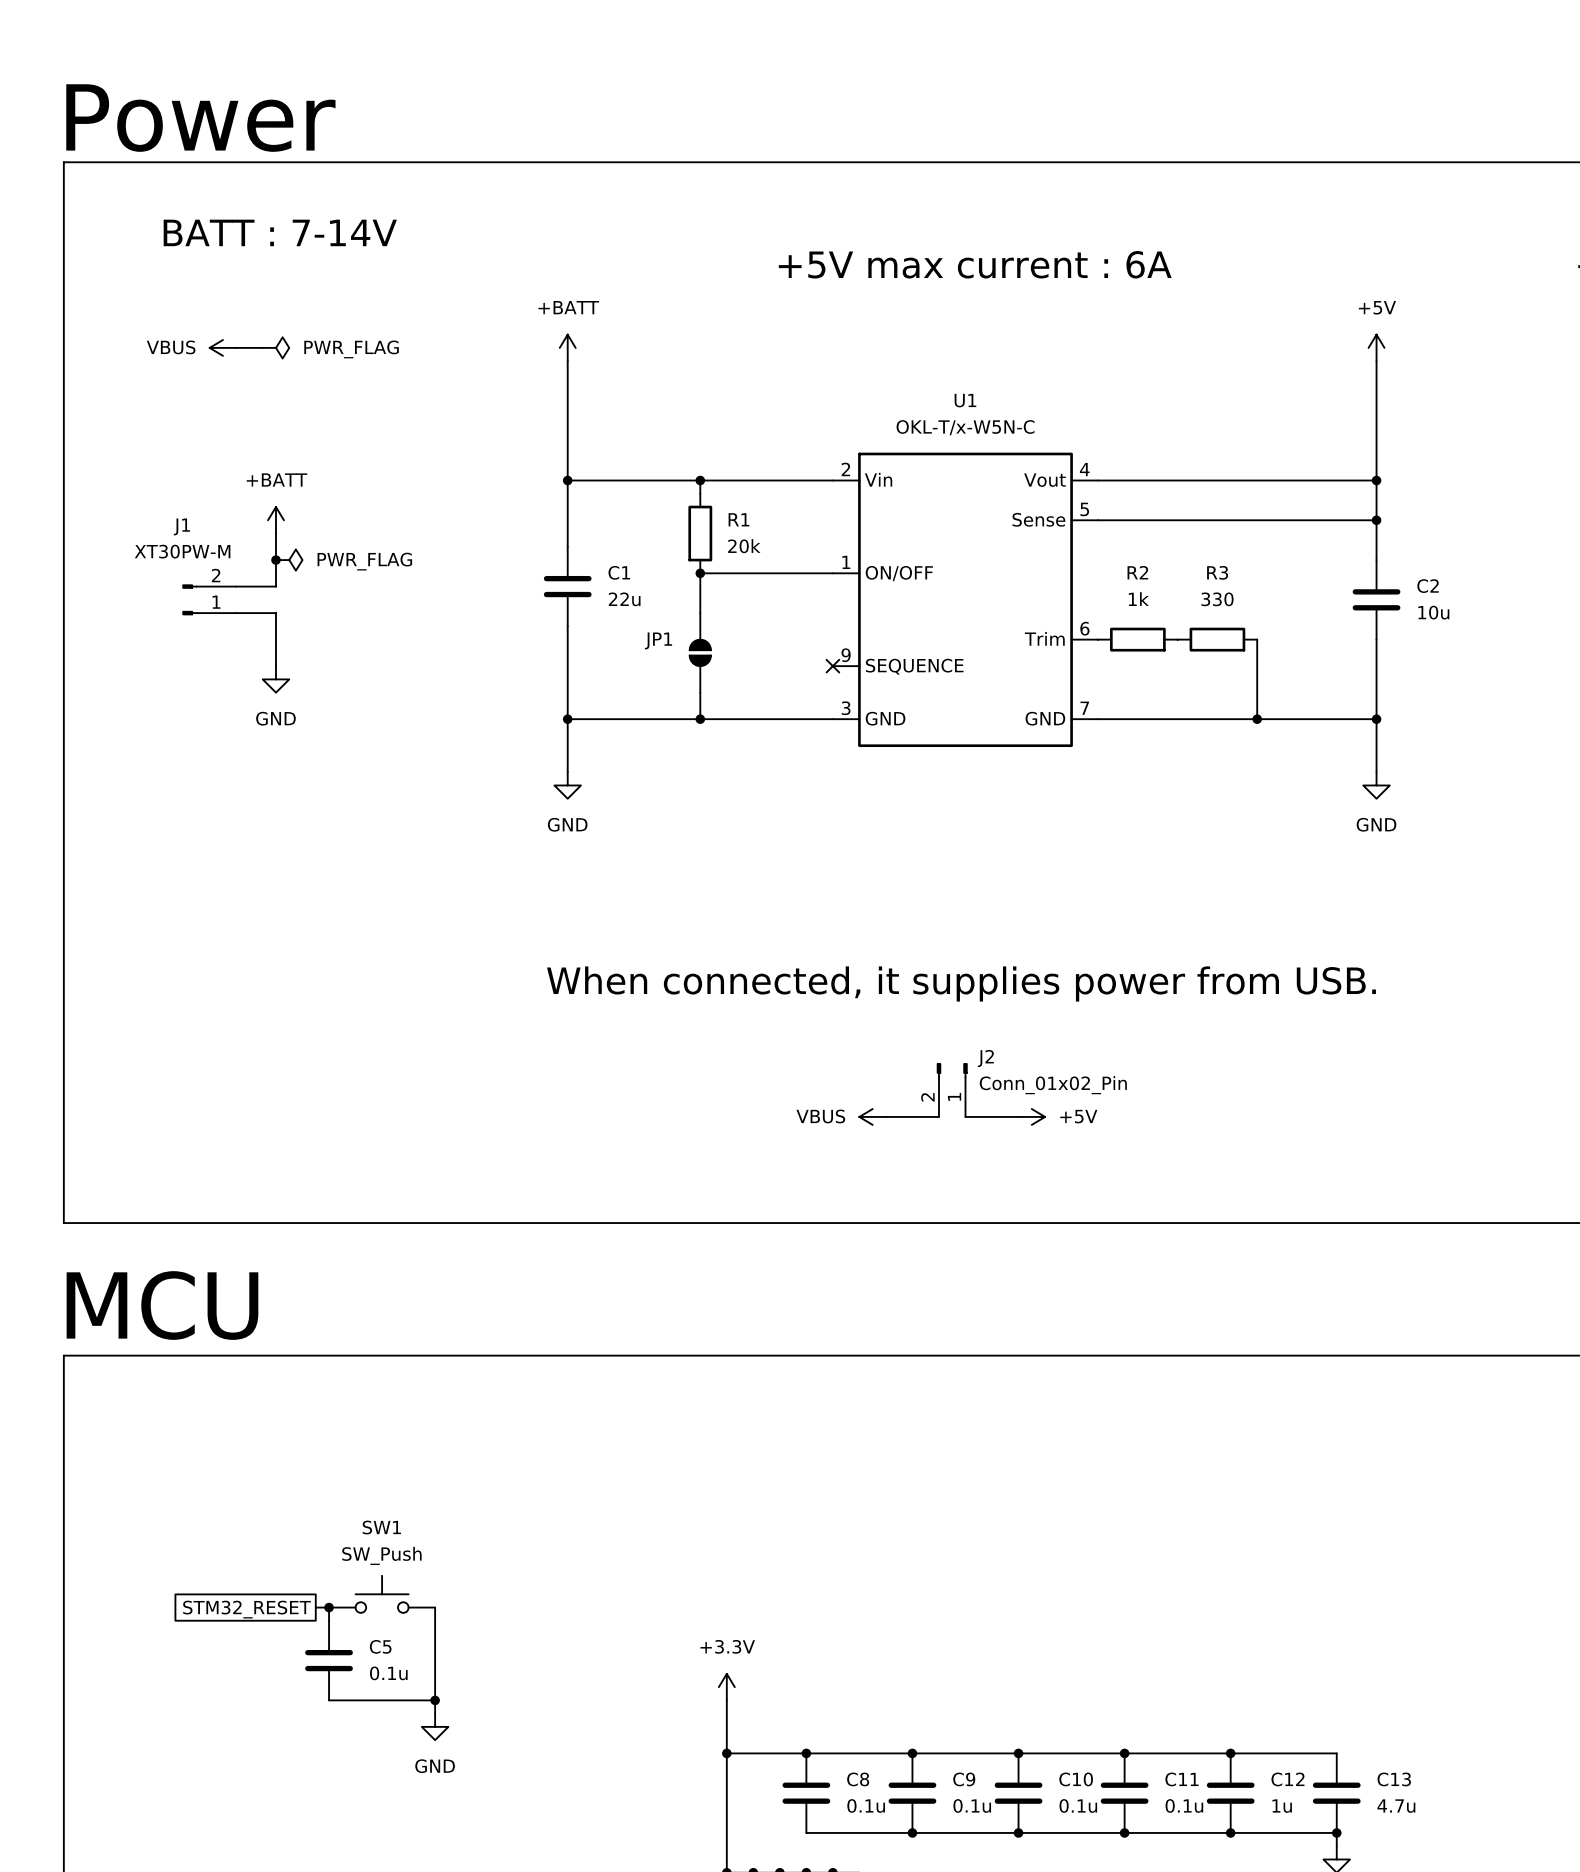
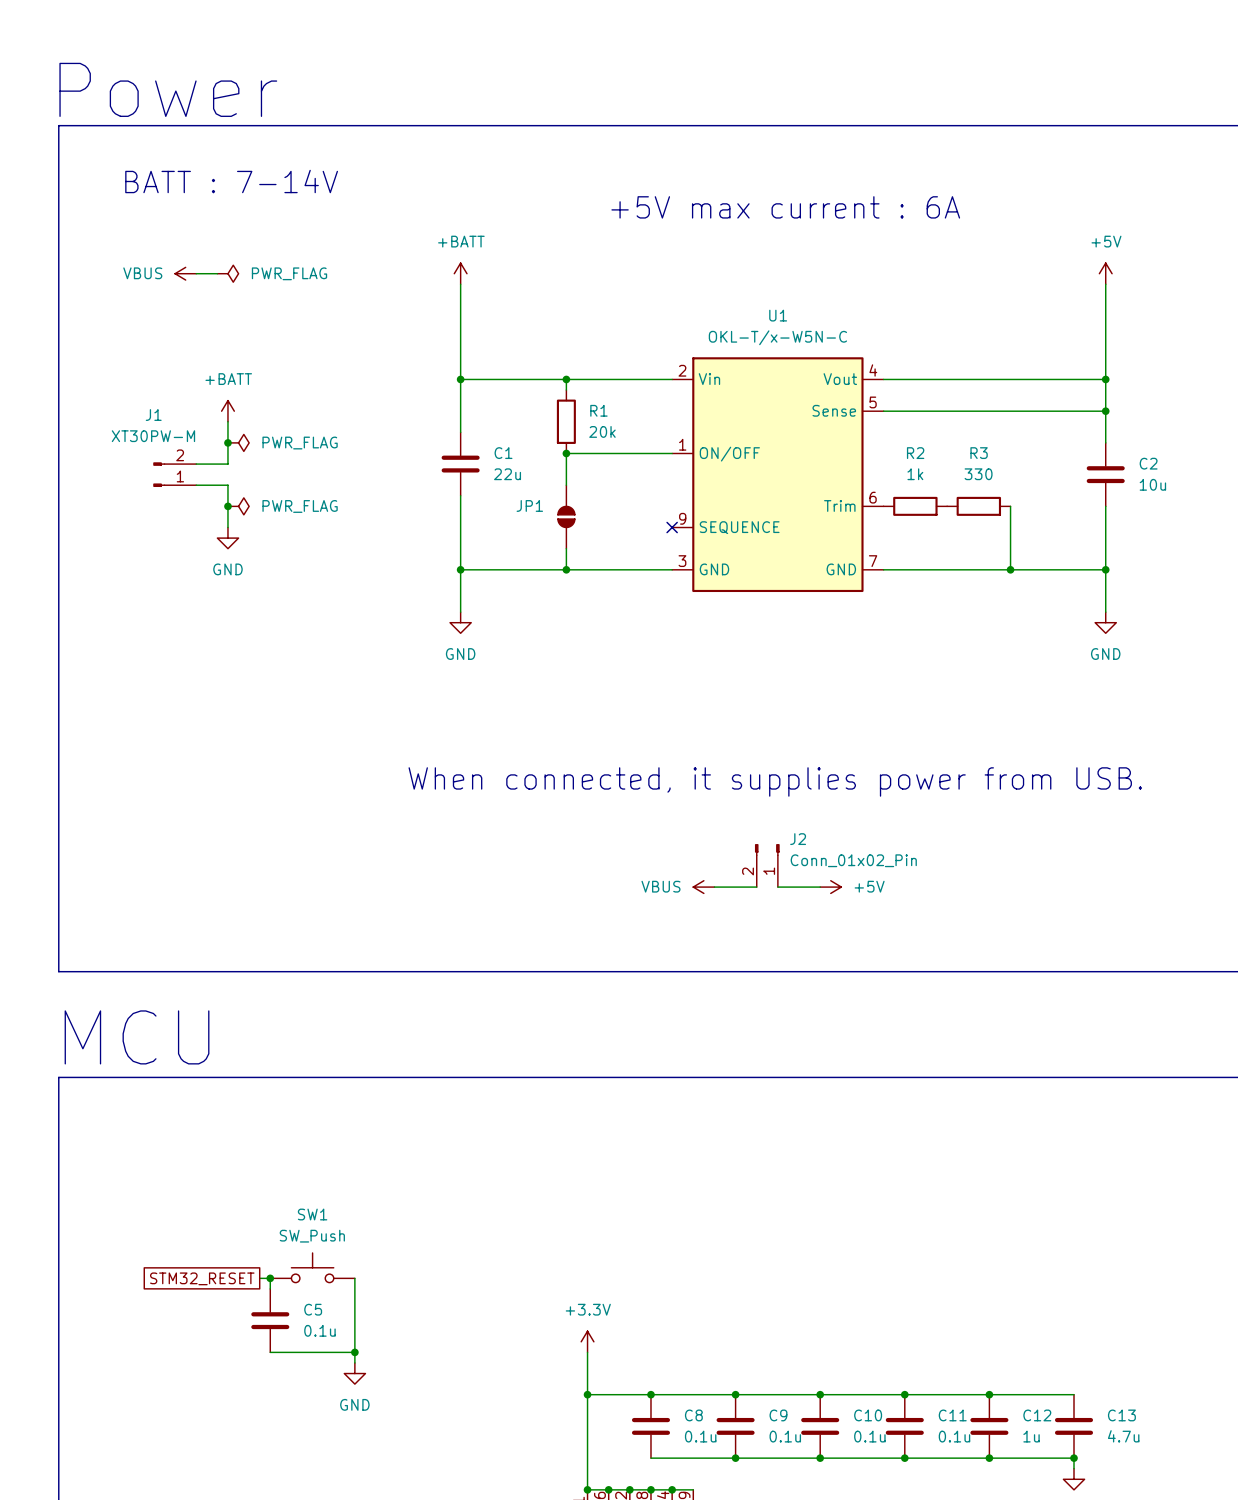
junction: none -> (227, 506)
power symbol: none -> PWR_FLAG (238, 506)

